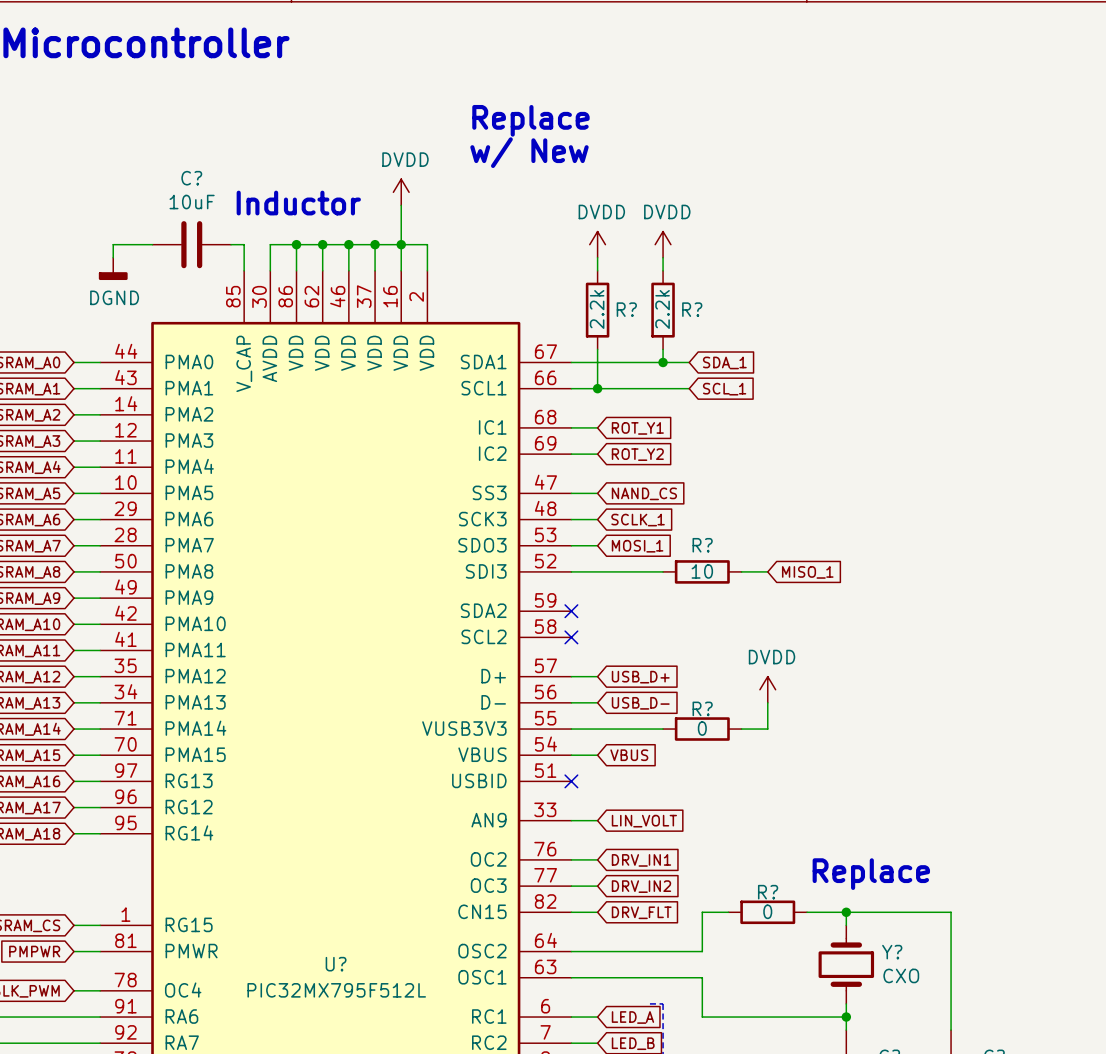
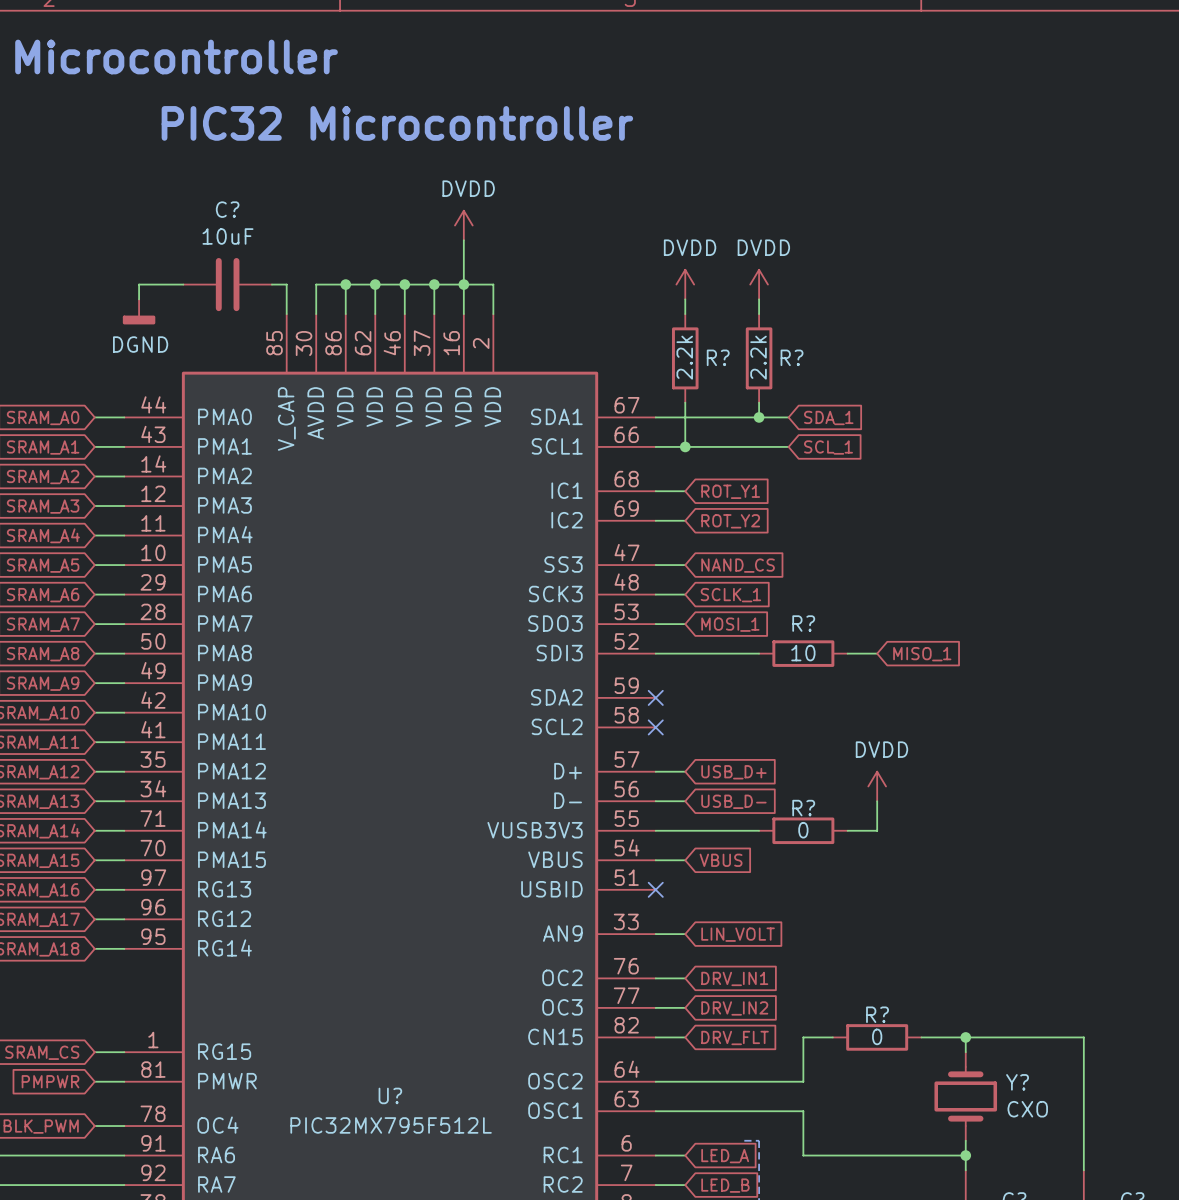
text: none -> PIC32 Microcontroller (397, 123)
text: Replace (530, 120) -> none
text: w/ New (529, 152) -> none
text: Inductor (298, 203) -> none
text: Replace (871, 874) -> none

